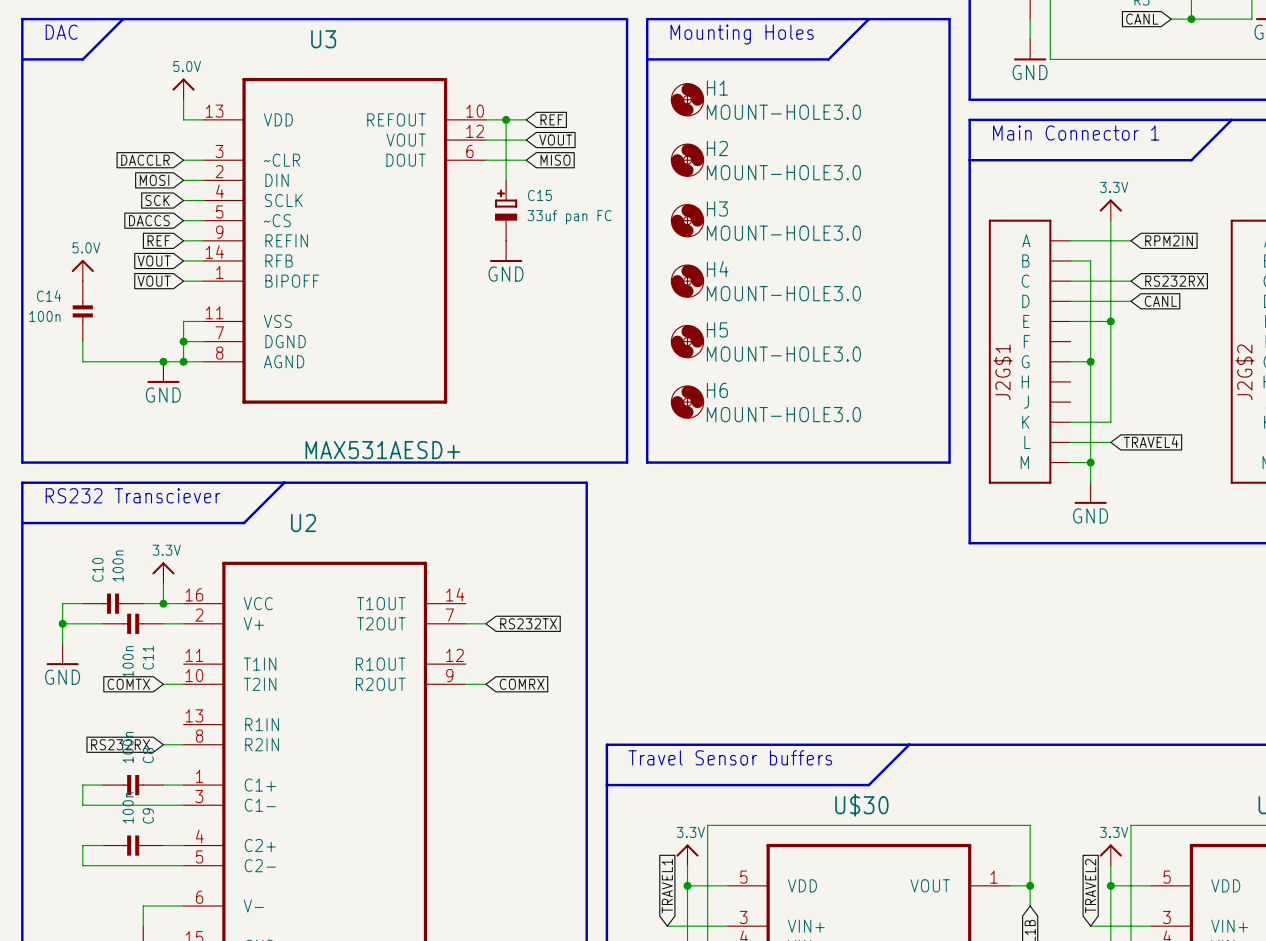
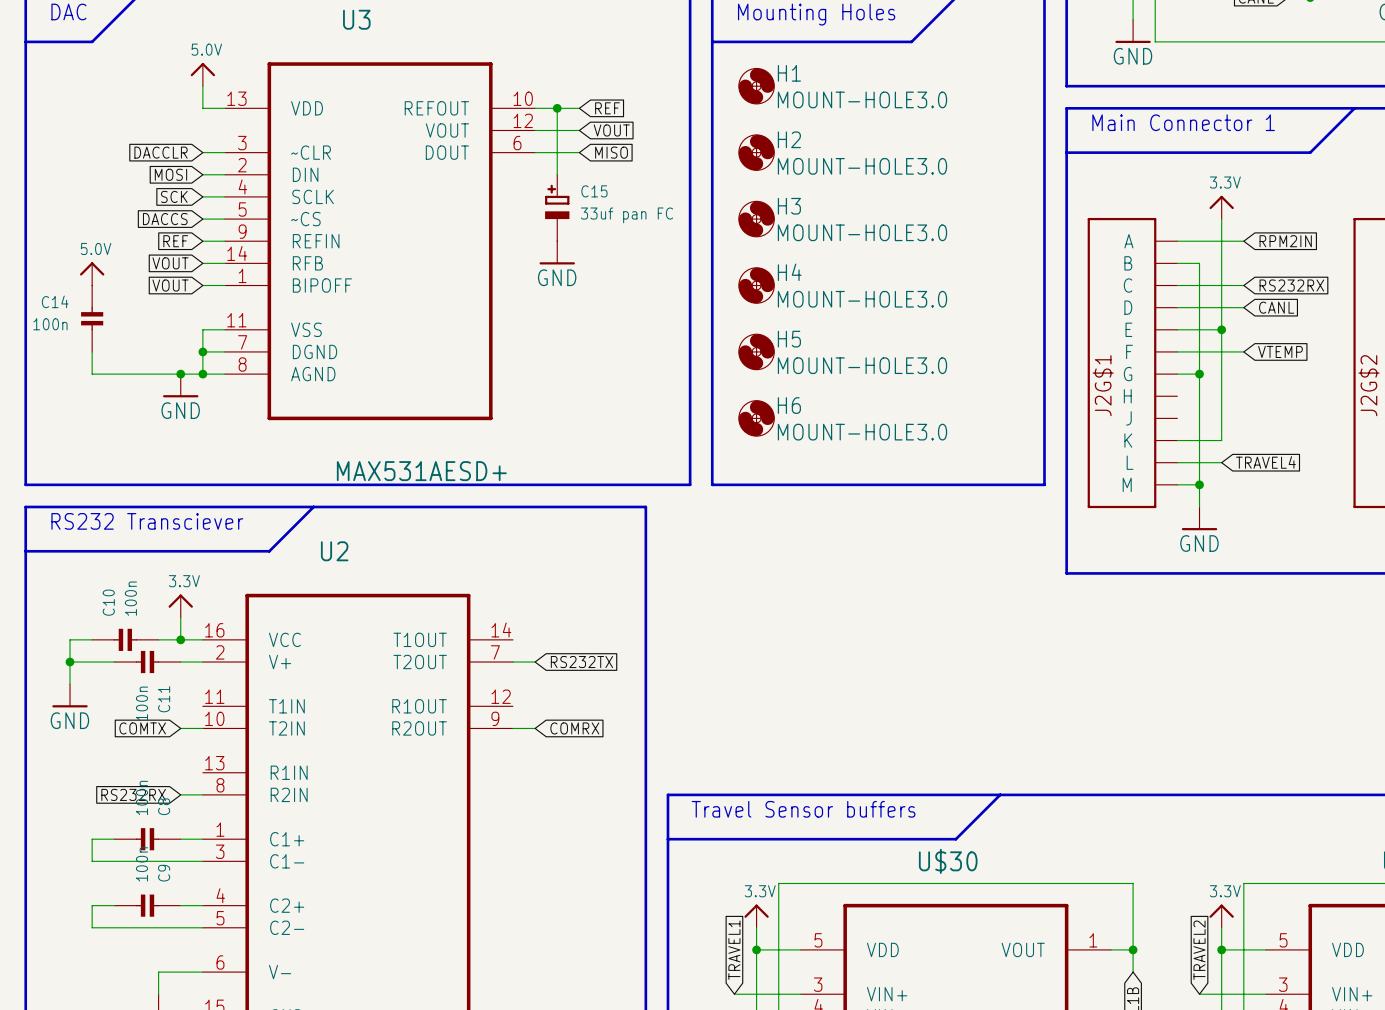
wire: none -> (1177, 351) (1243, 351)
global label: none -> VTEMP (1280, 351)

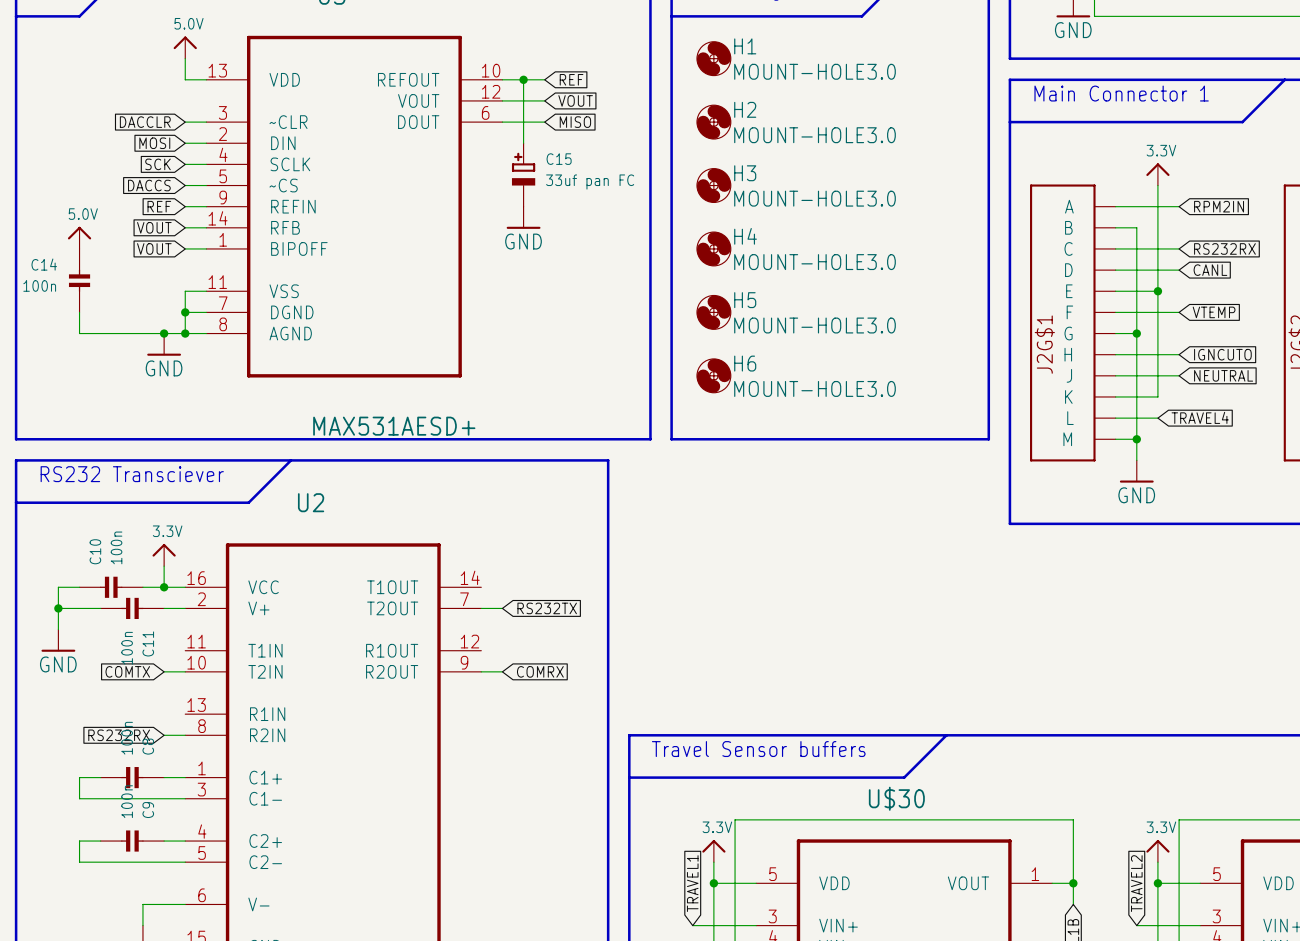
wire: none -> (1115, 354) (1179, 354)
global label: none -> IGNCUTO (1222, 354)
wire: none -> (1115, 375) (1179, 375)
global label: none -> NEUTRAL (1223, 375)

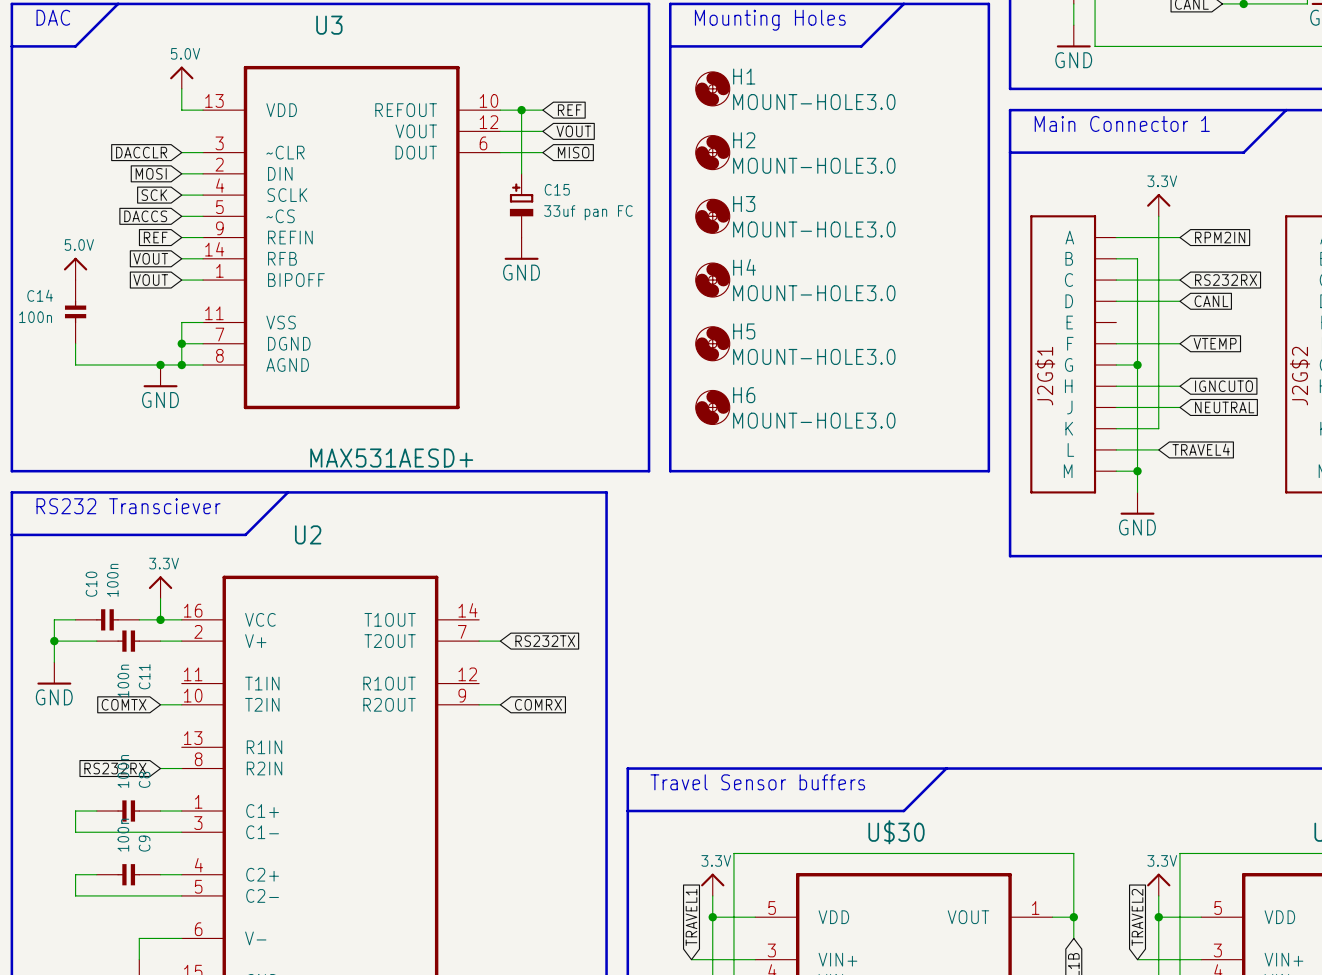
wire: (1115, 291) (1157, 291) -> none
junction: (1157, 291) -> none

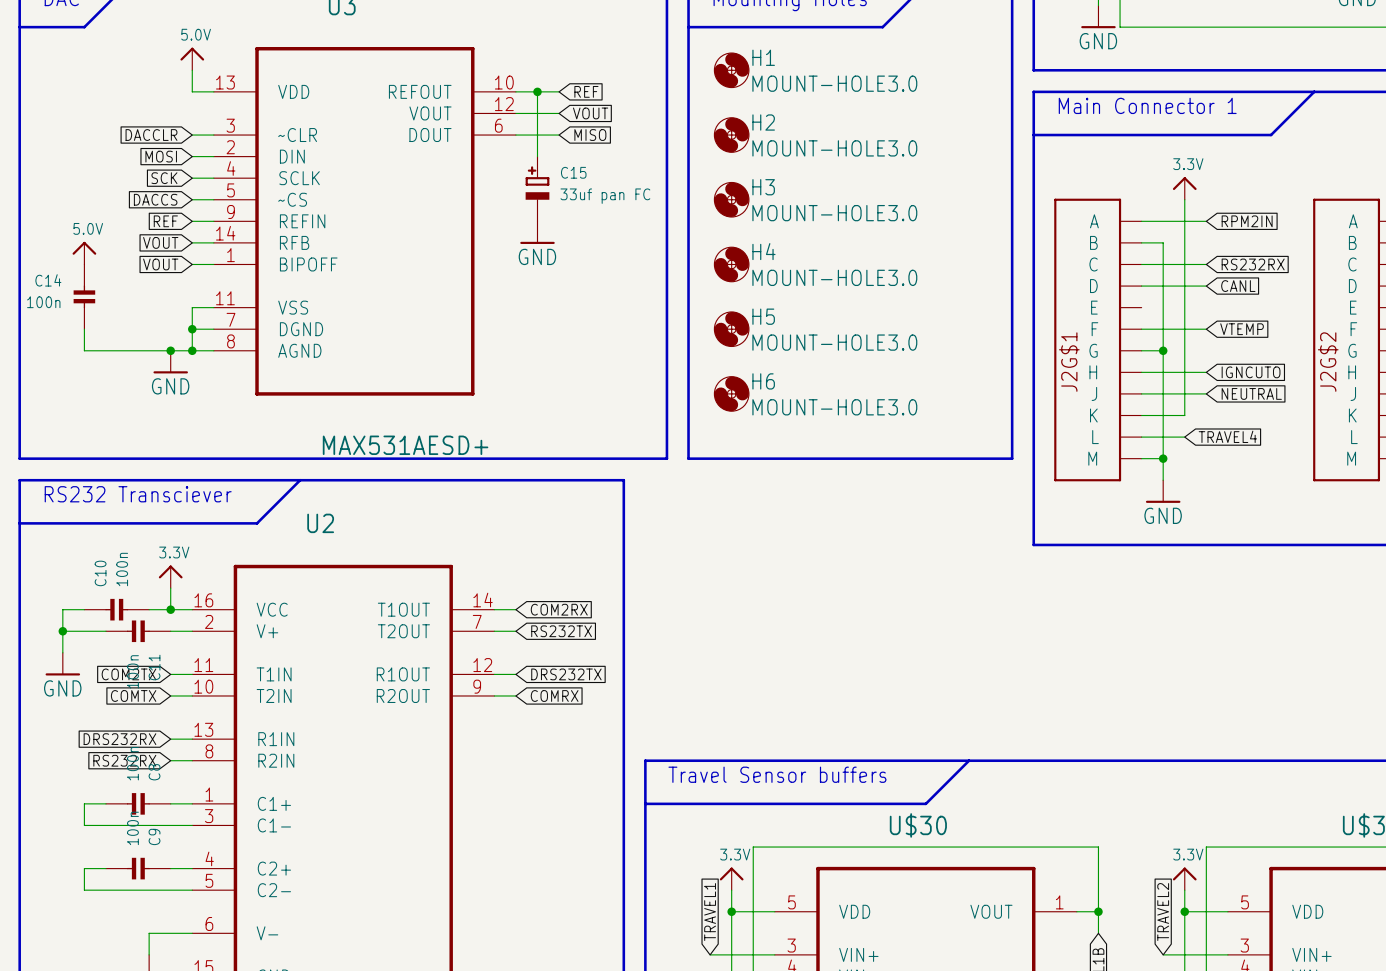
wire: none -> (494, 609) (515, 609)
global label: none -> COM2RX (559, 609)
global label: none -> COM2TX (128, 674)
wire: none -> (170, 674) (192, 674)
wire: none -> (494, 674) (515, 674)
global label: none -> DRS232TX (566, 674)
global label: none -> DRS232RX (119, 739)
wire: none -> (170, 739) (192, 739)

